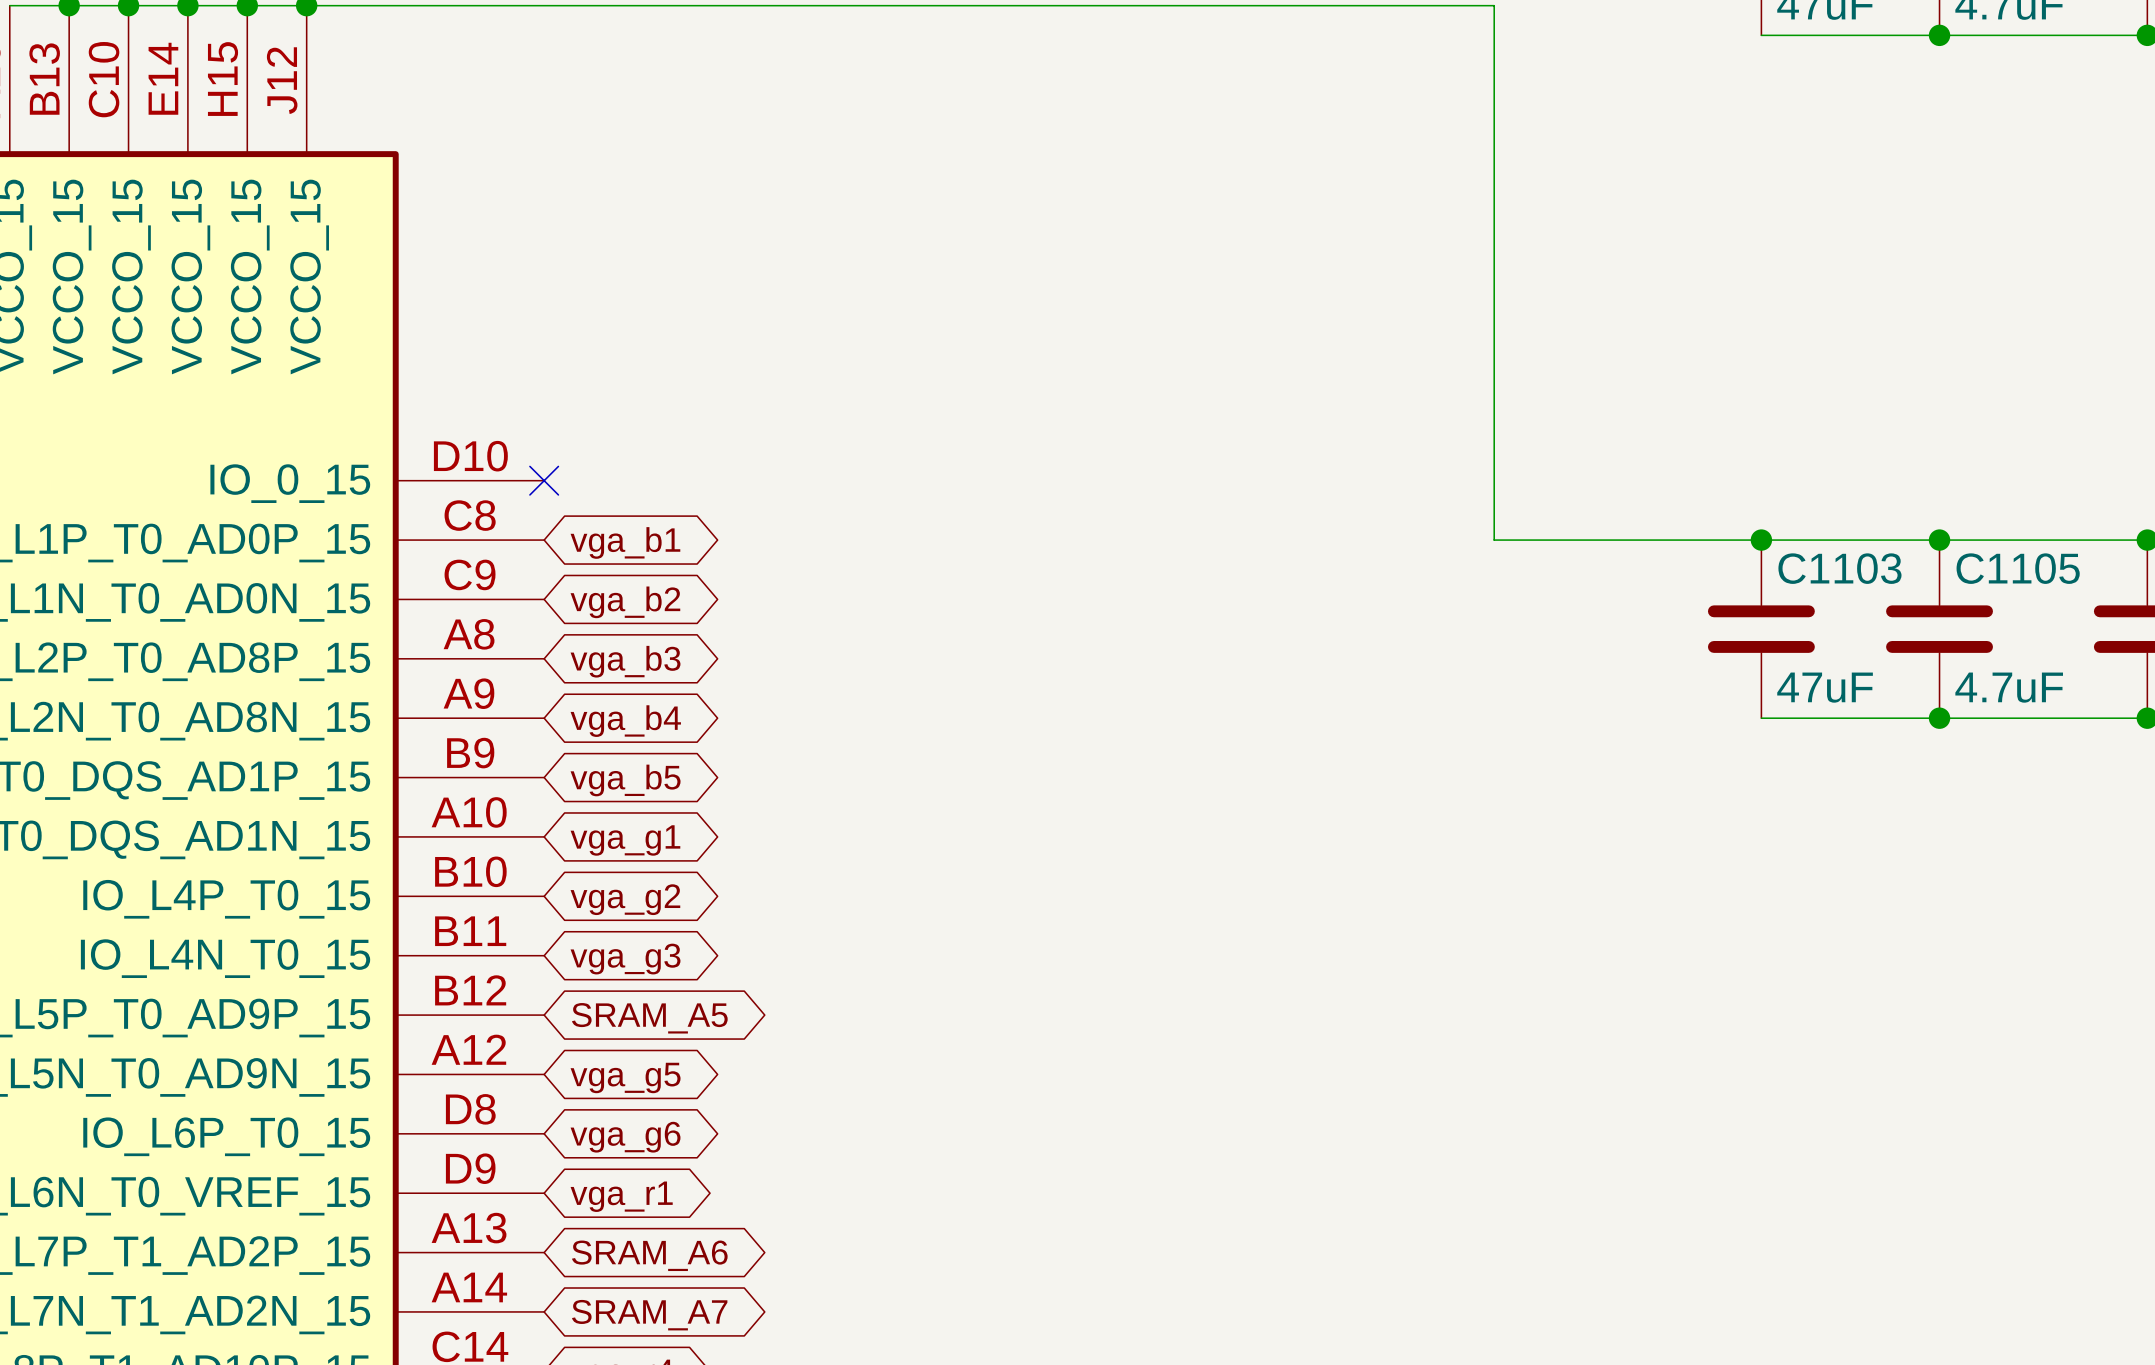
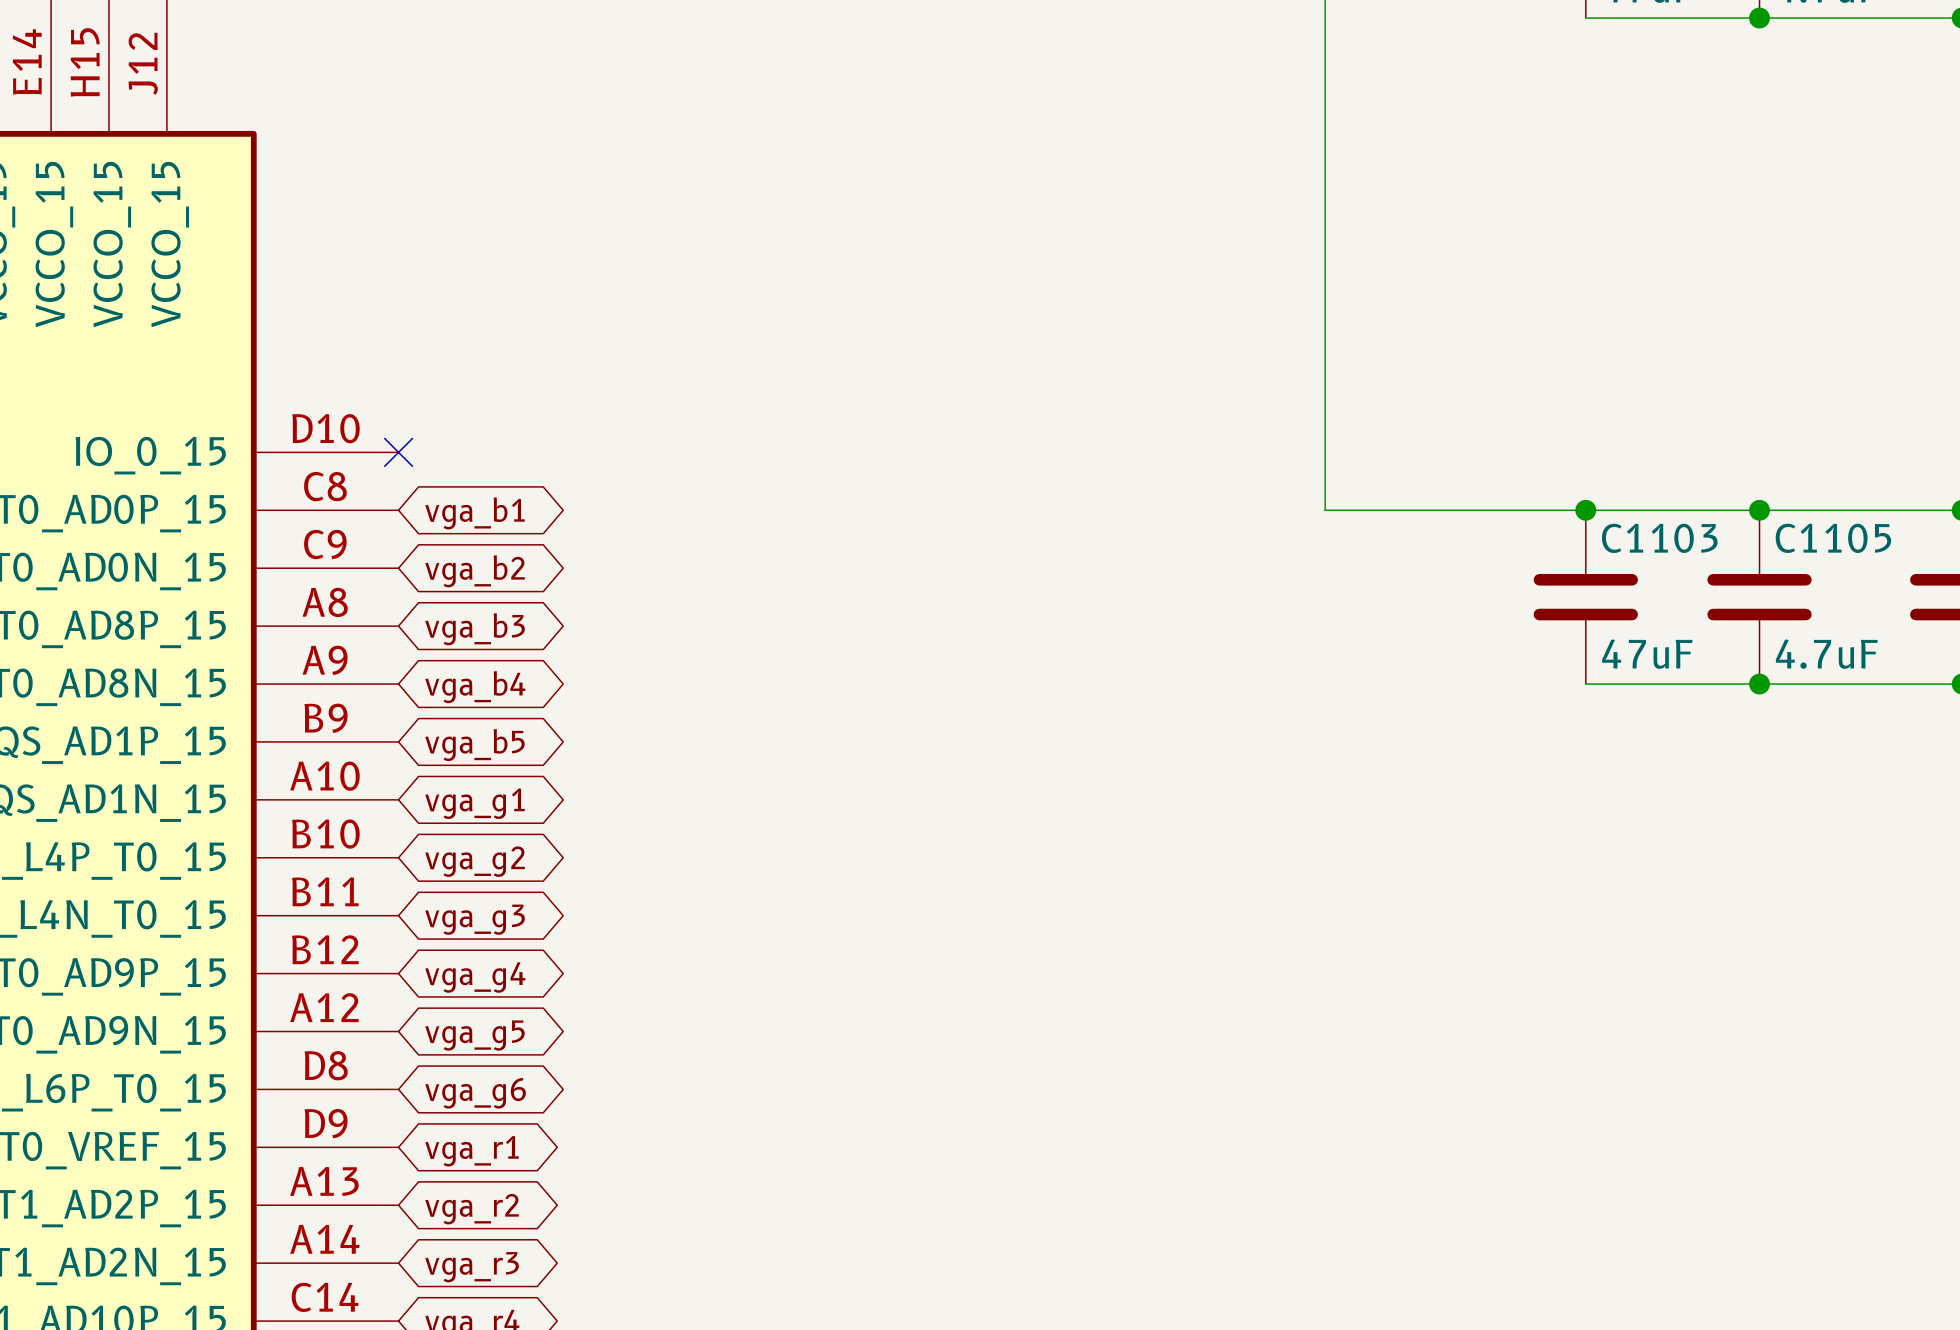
global label: SRAM_A5 (649, 1018) -> vga_g4 (475, 977)
global label: SRAM_A6 (649, 1255) -> vga_r2 (472, 1209)
global label: SRAM_A7 (649, 1315) -> vga_r3 (472, 1267)

